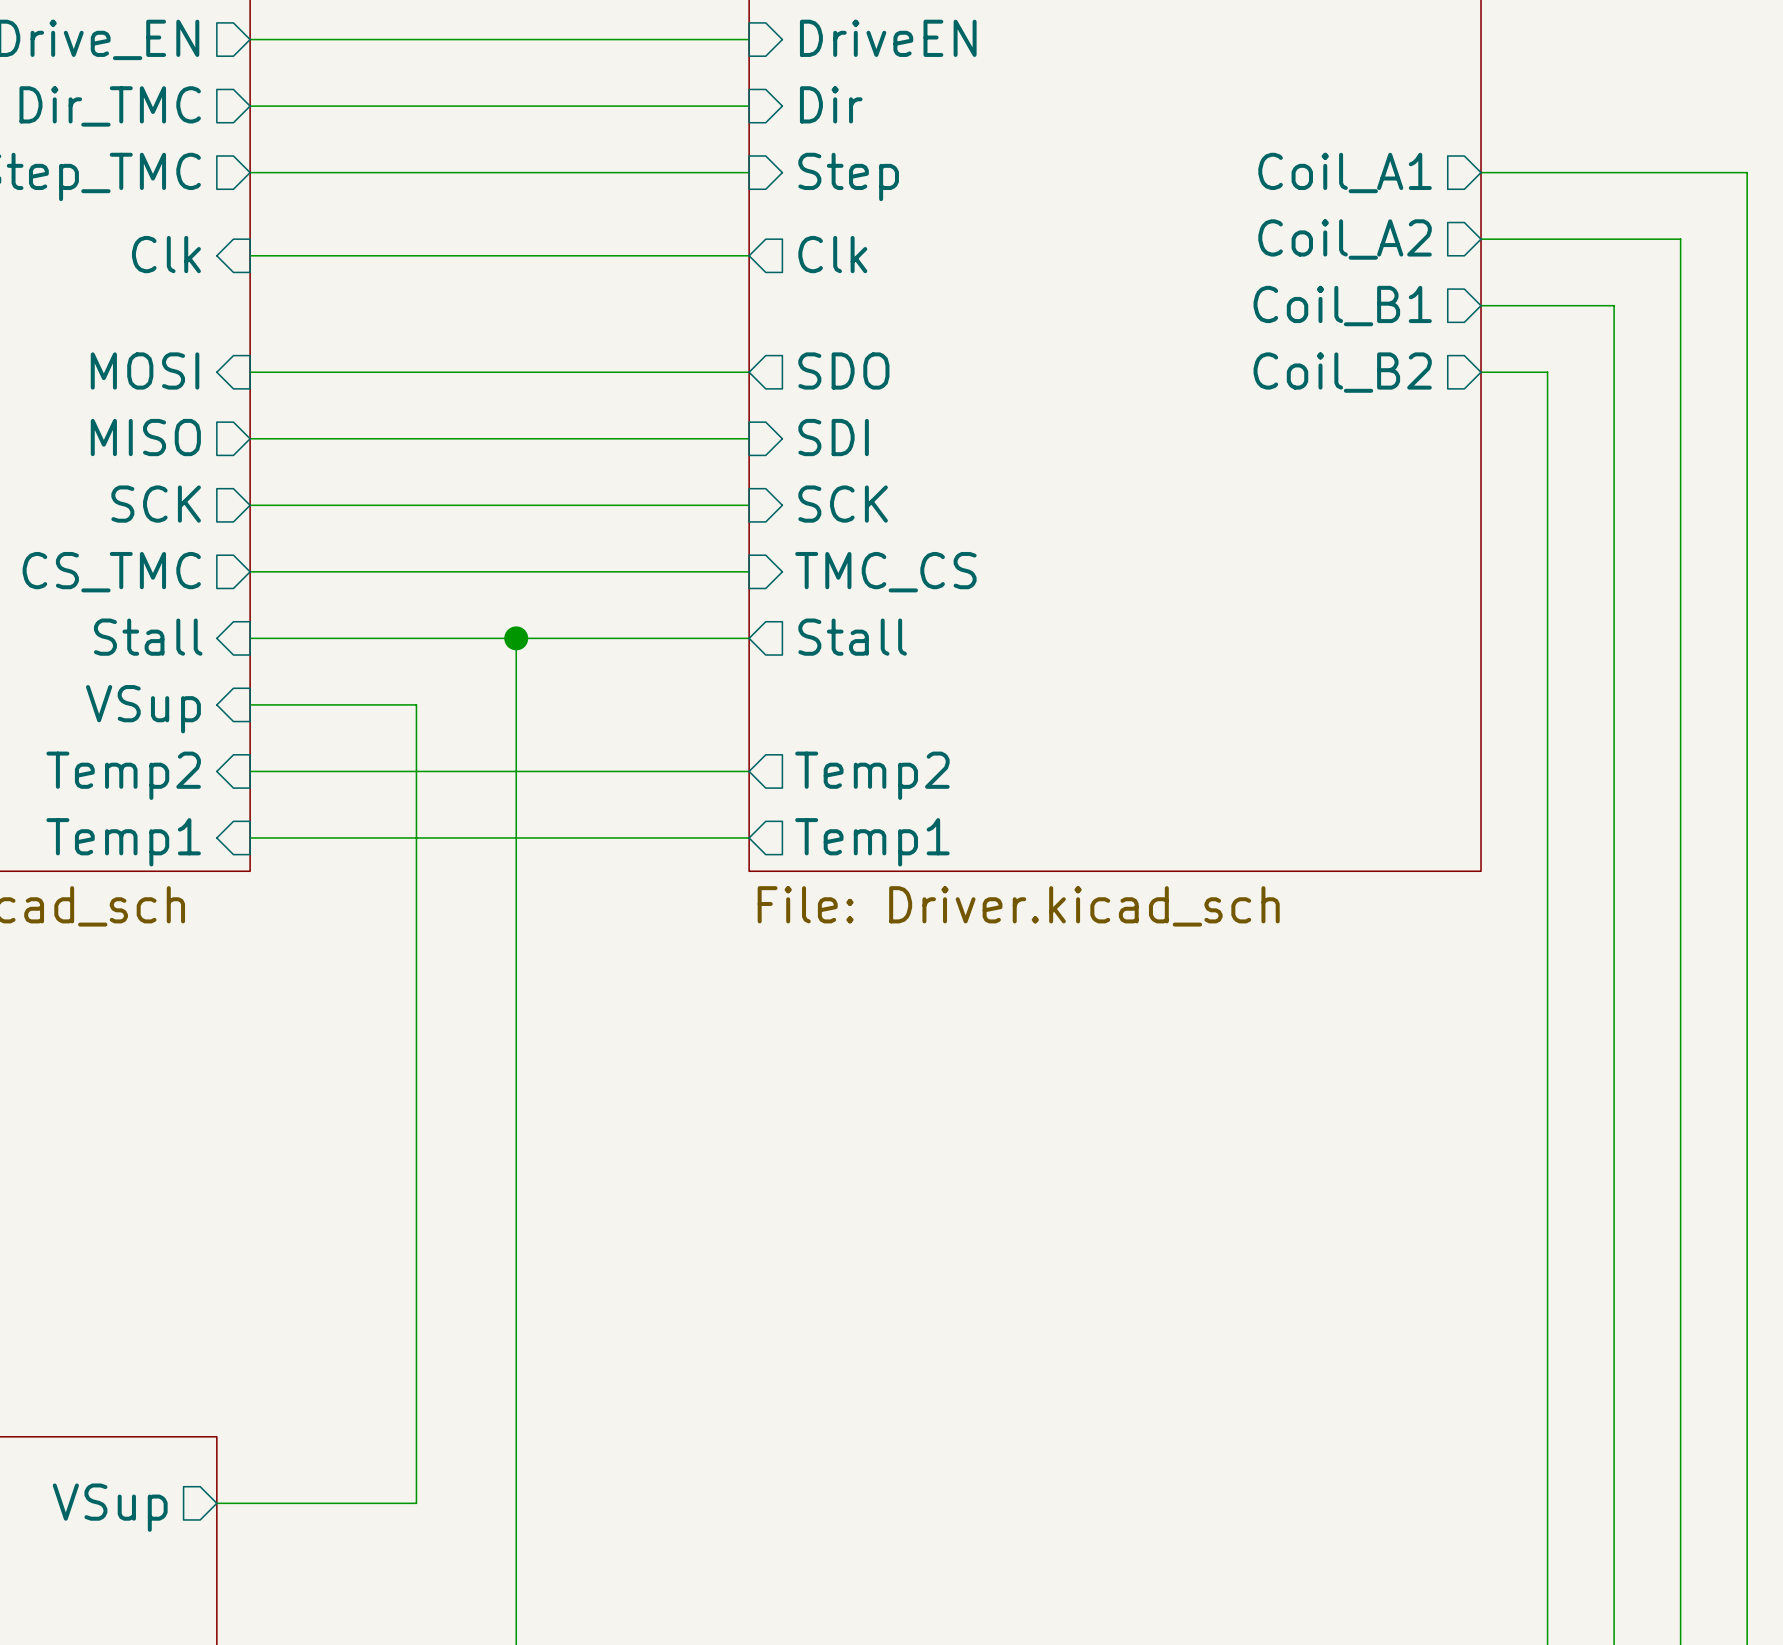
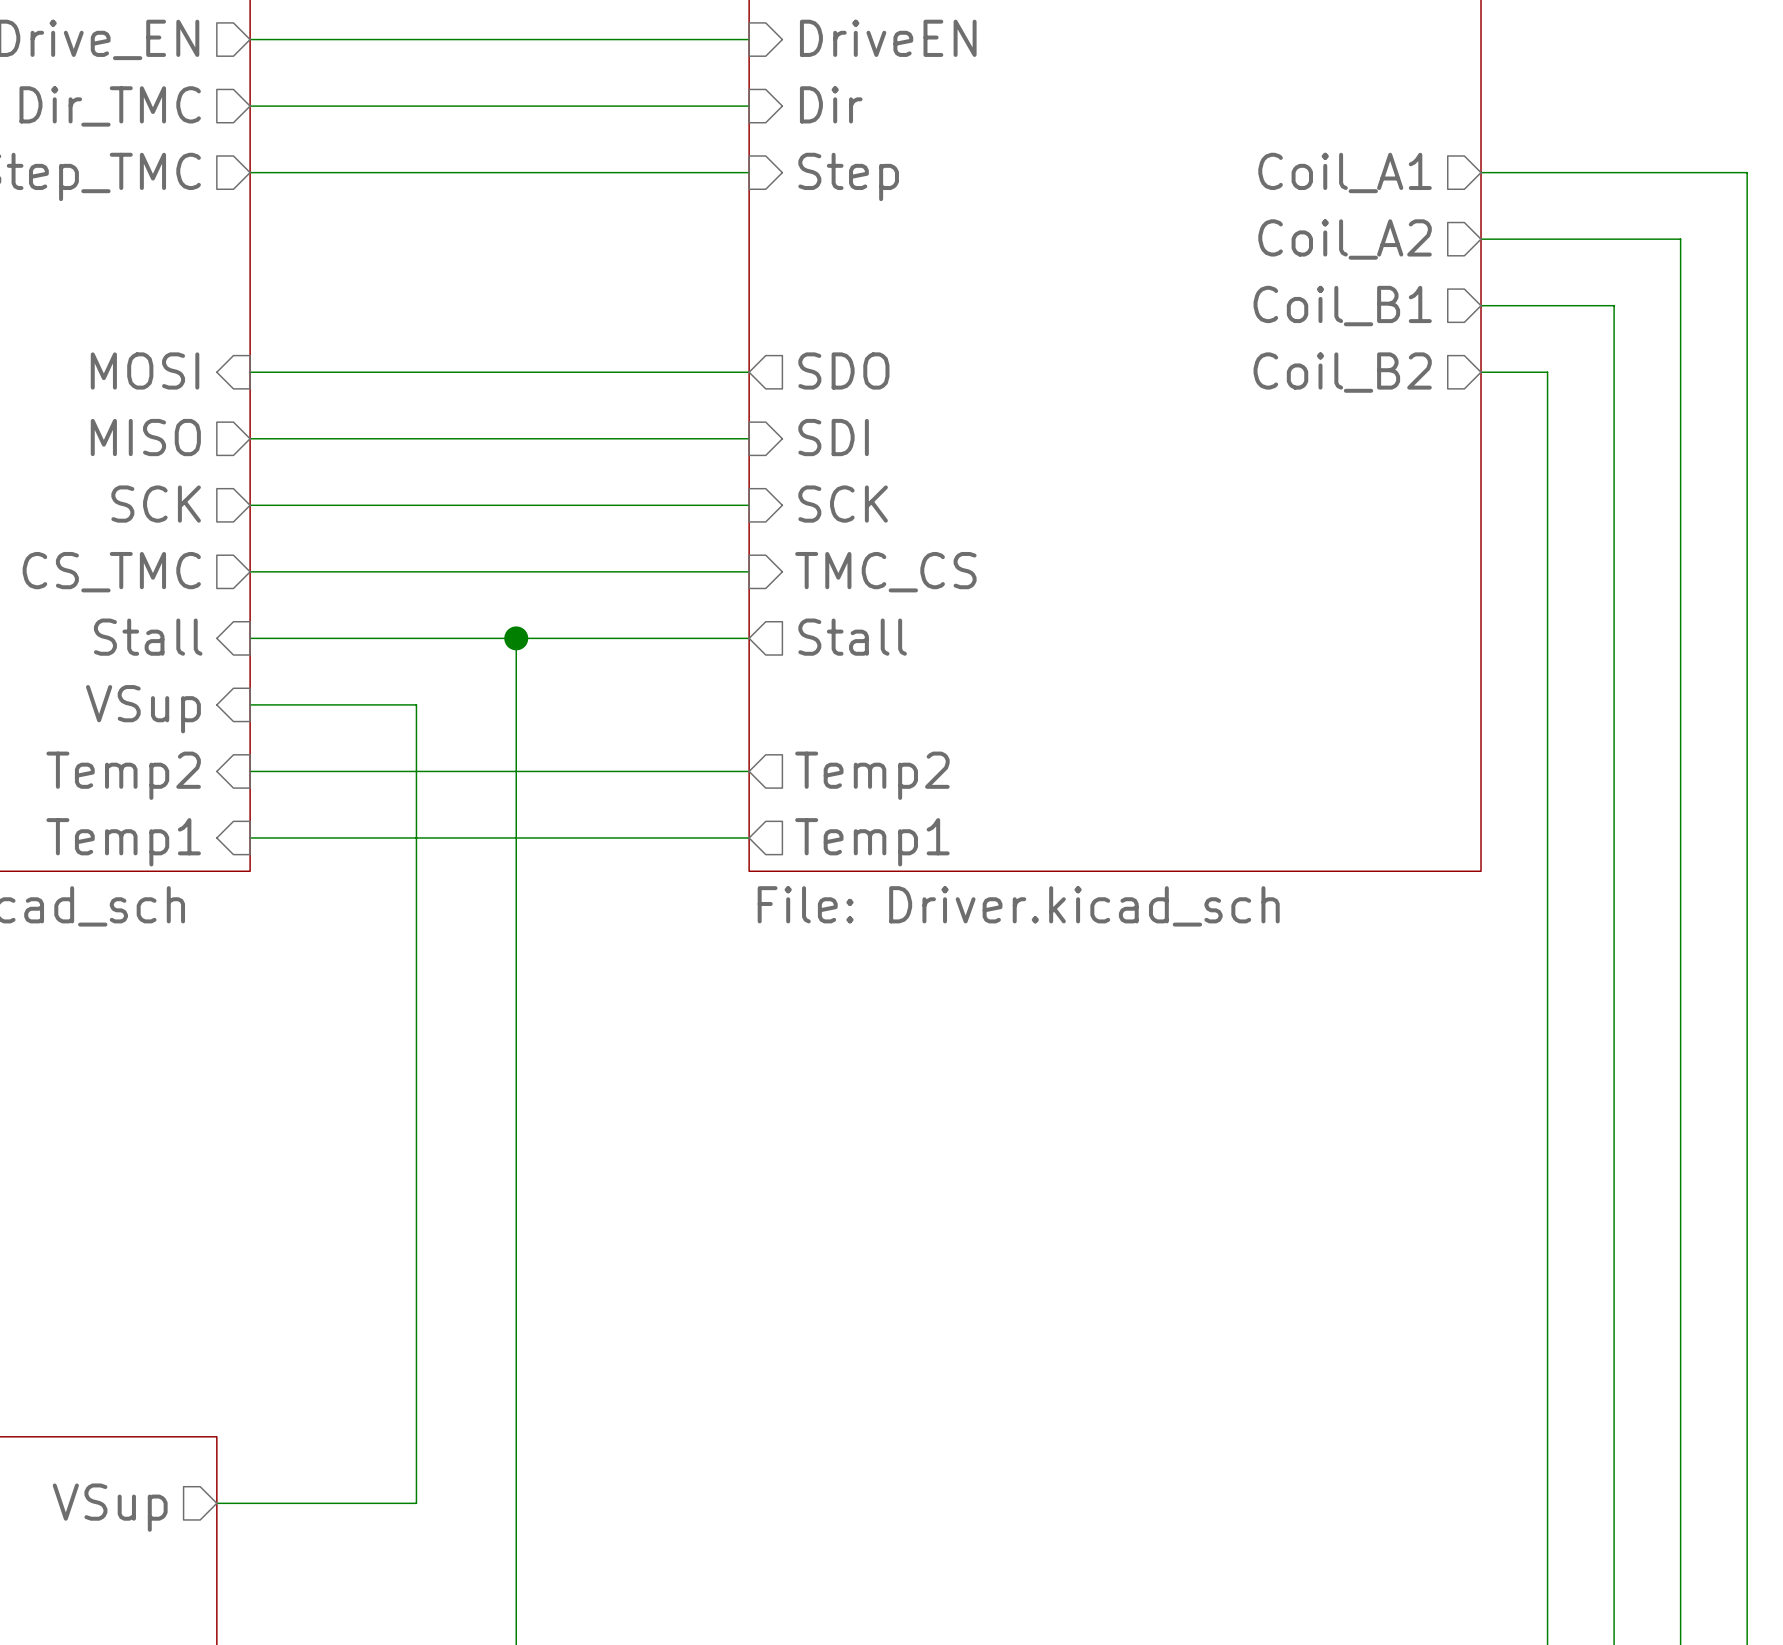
sheet pin: Clk (166, 254) -> none
sheet pin: Clk (832, 254) -> none
wire: (250, 255) (749, 255) -> none

